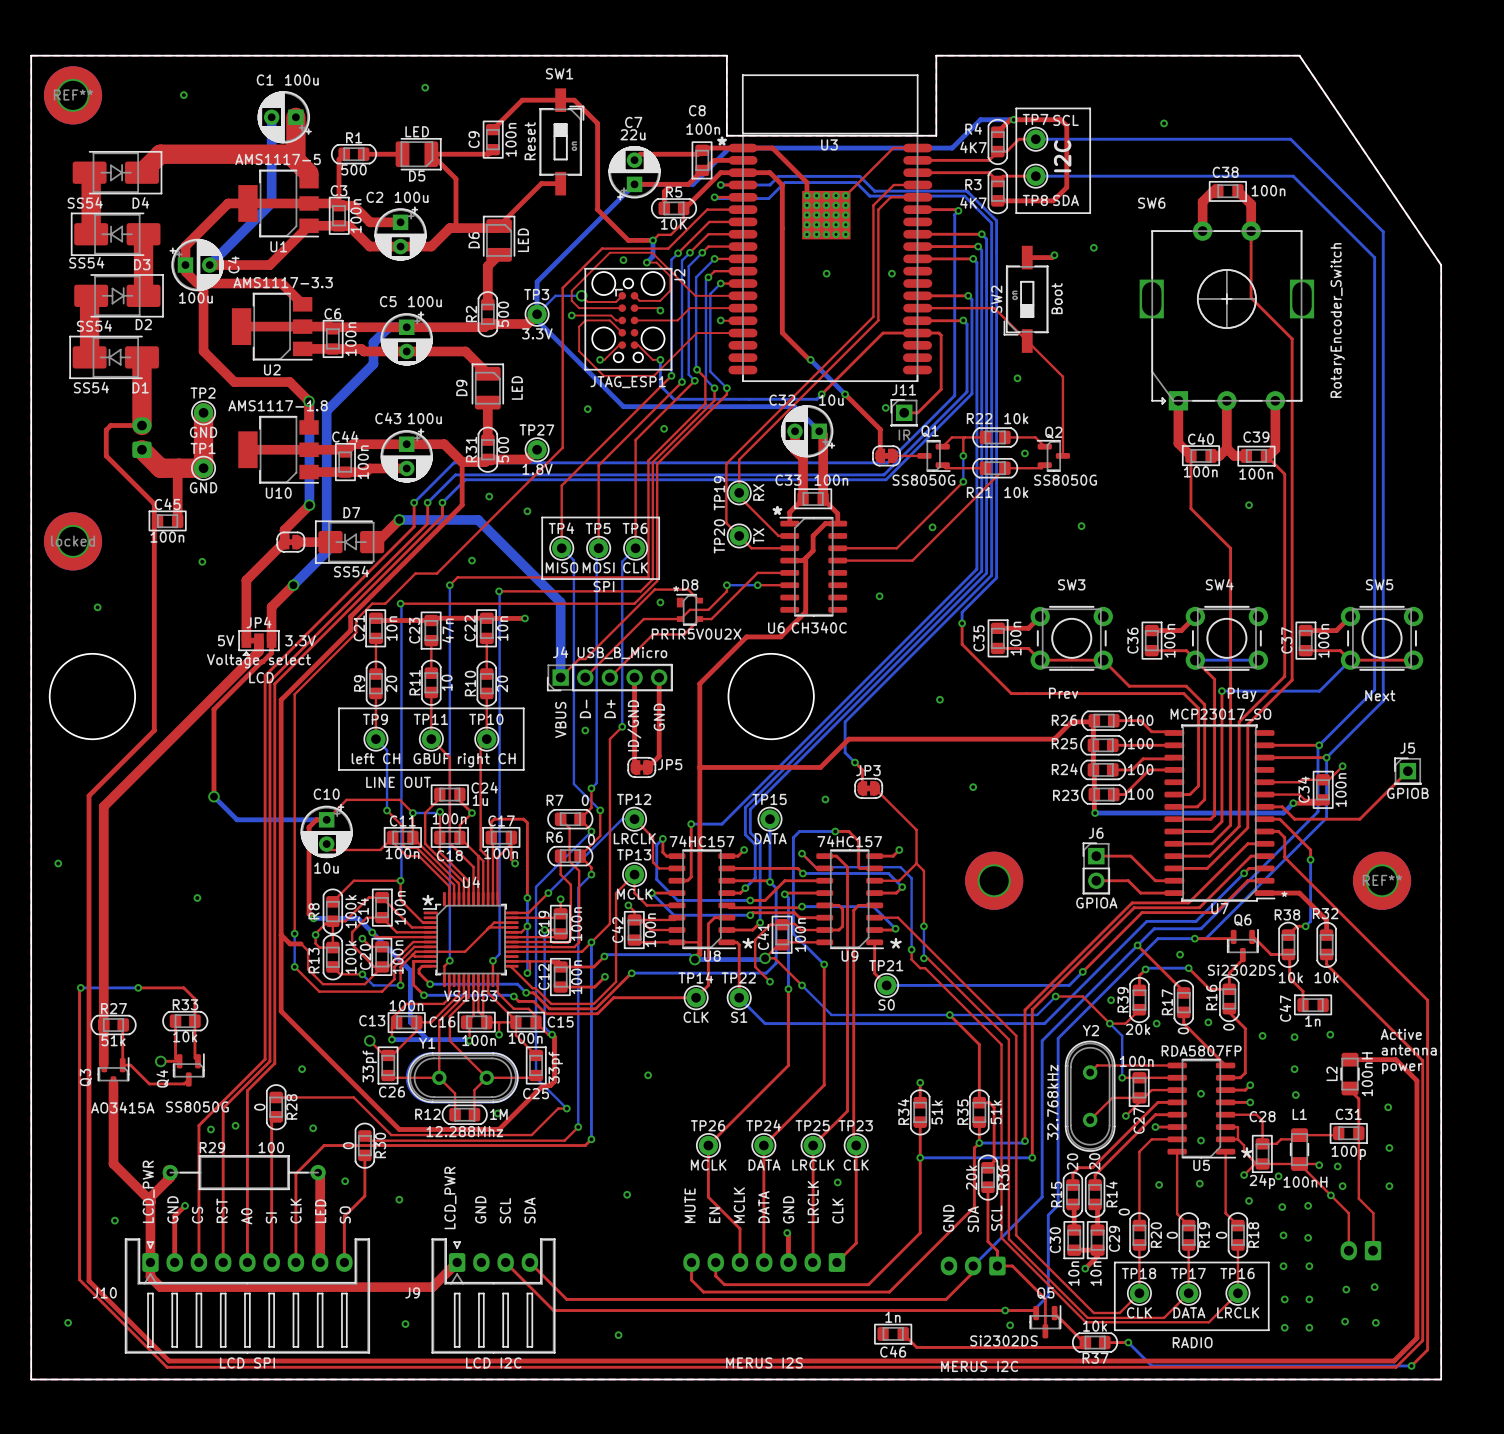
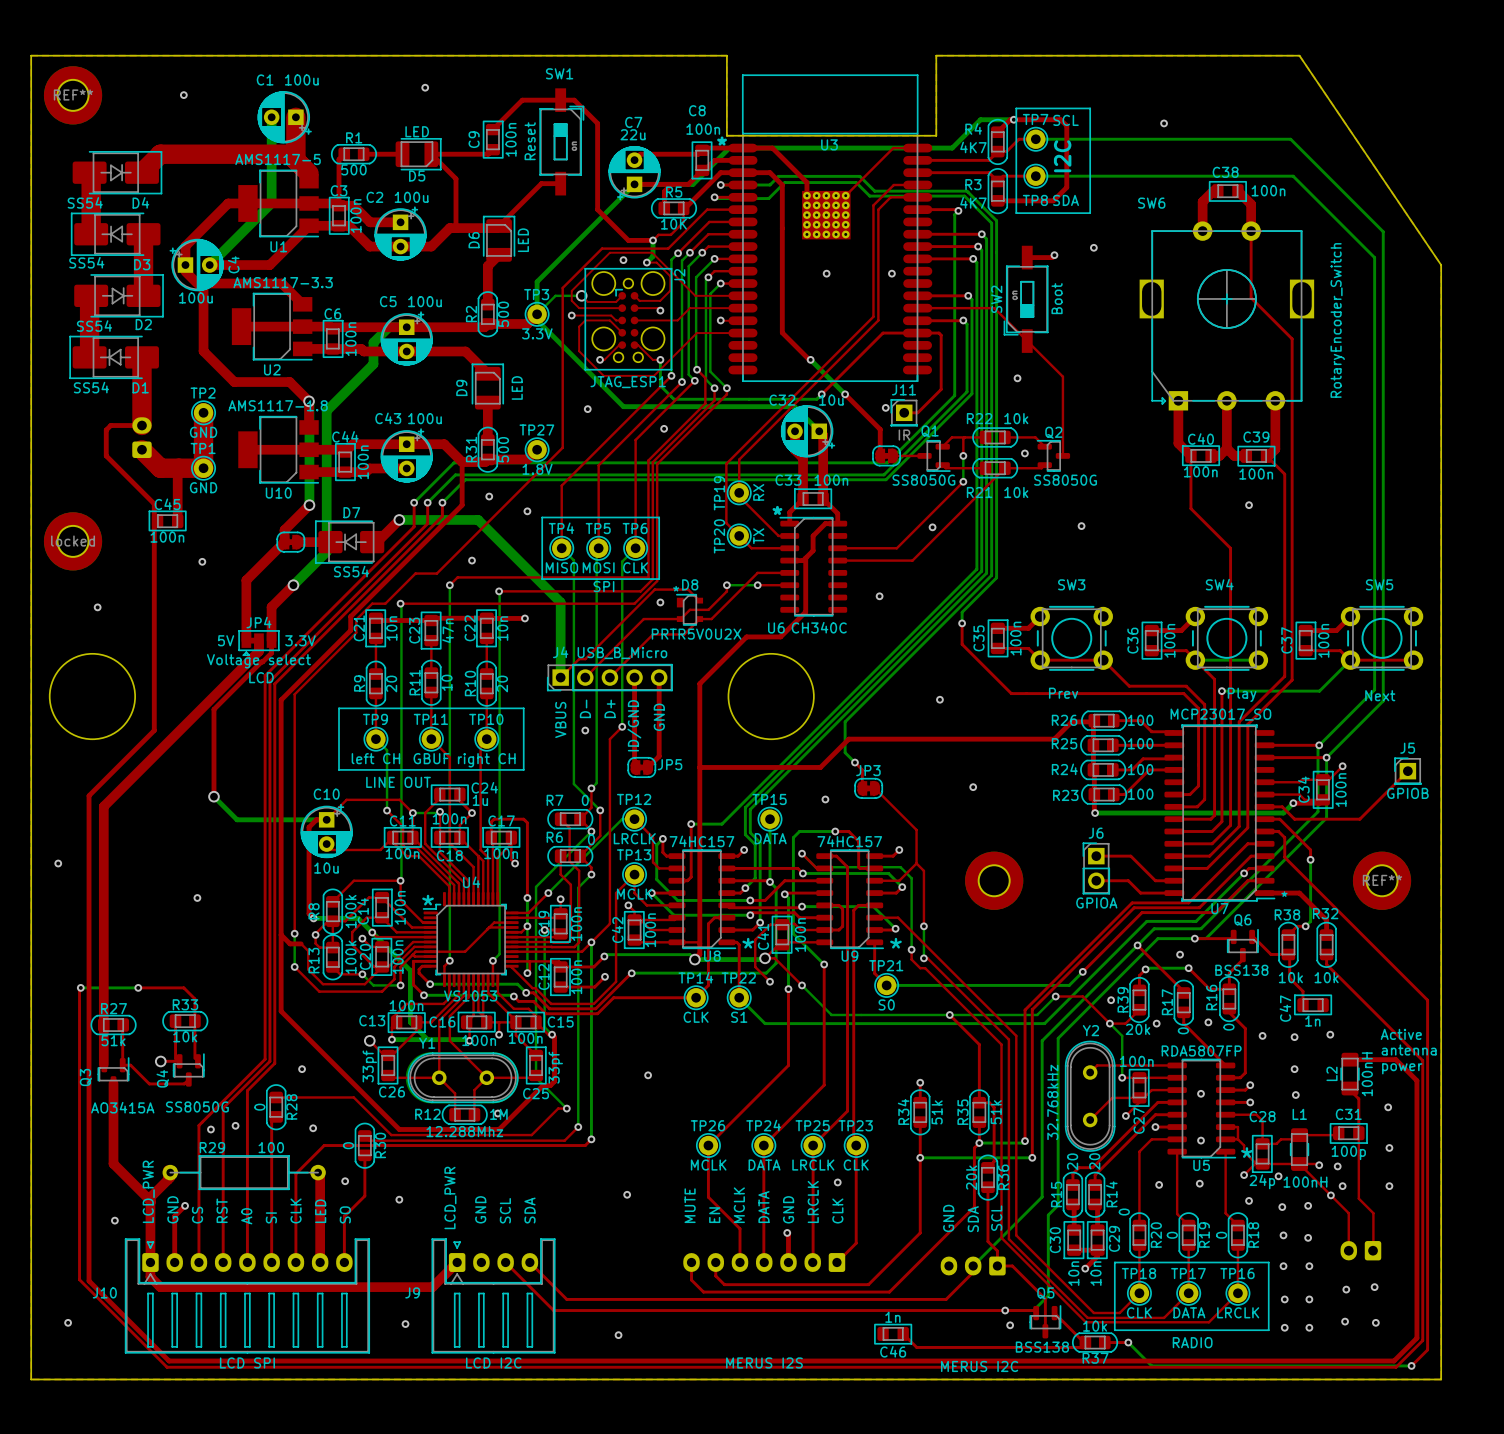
Q6 value: Si2302DS (1241, 970) -> BSS138 (1241, 970)
Q5 value: Si2302DS (1003, 1340) -> BSS138 (1042, 1347)

